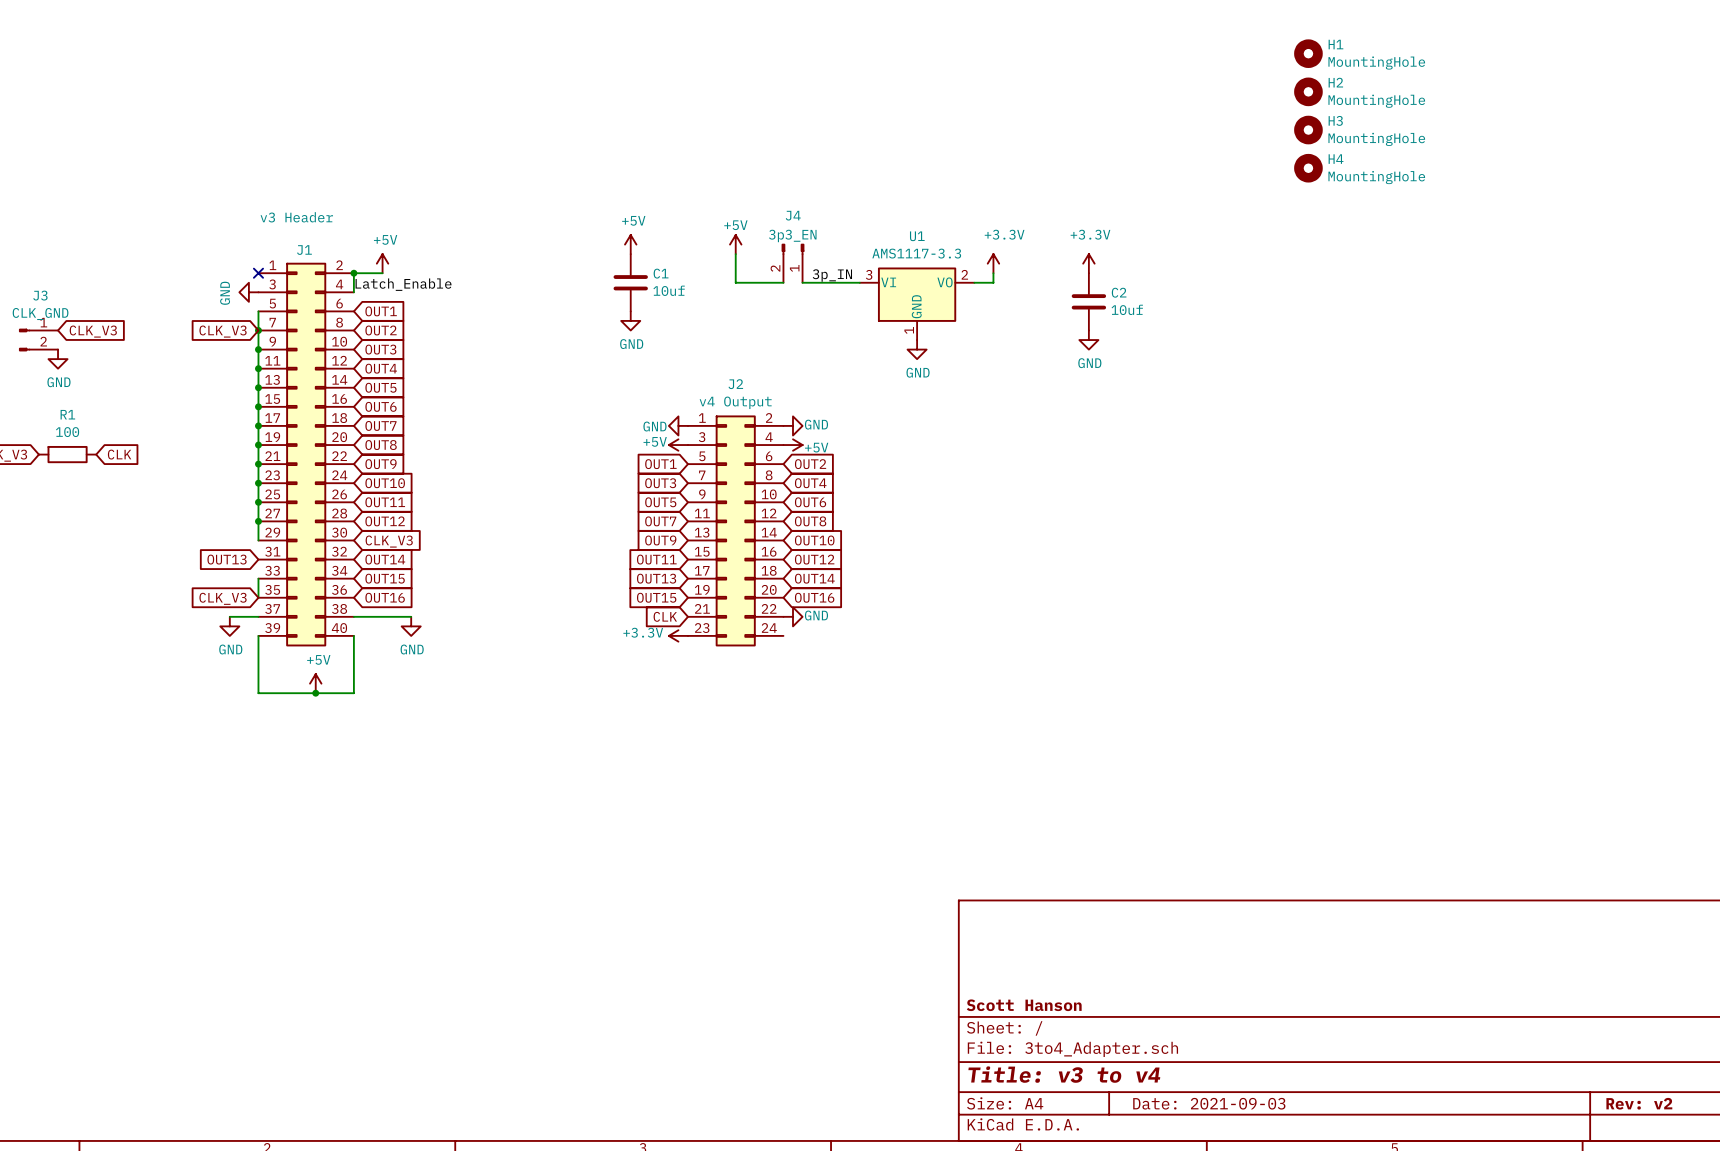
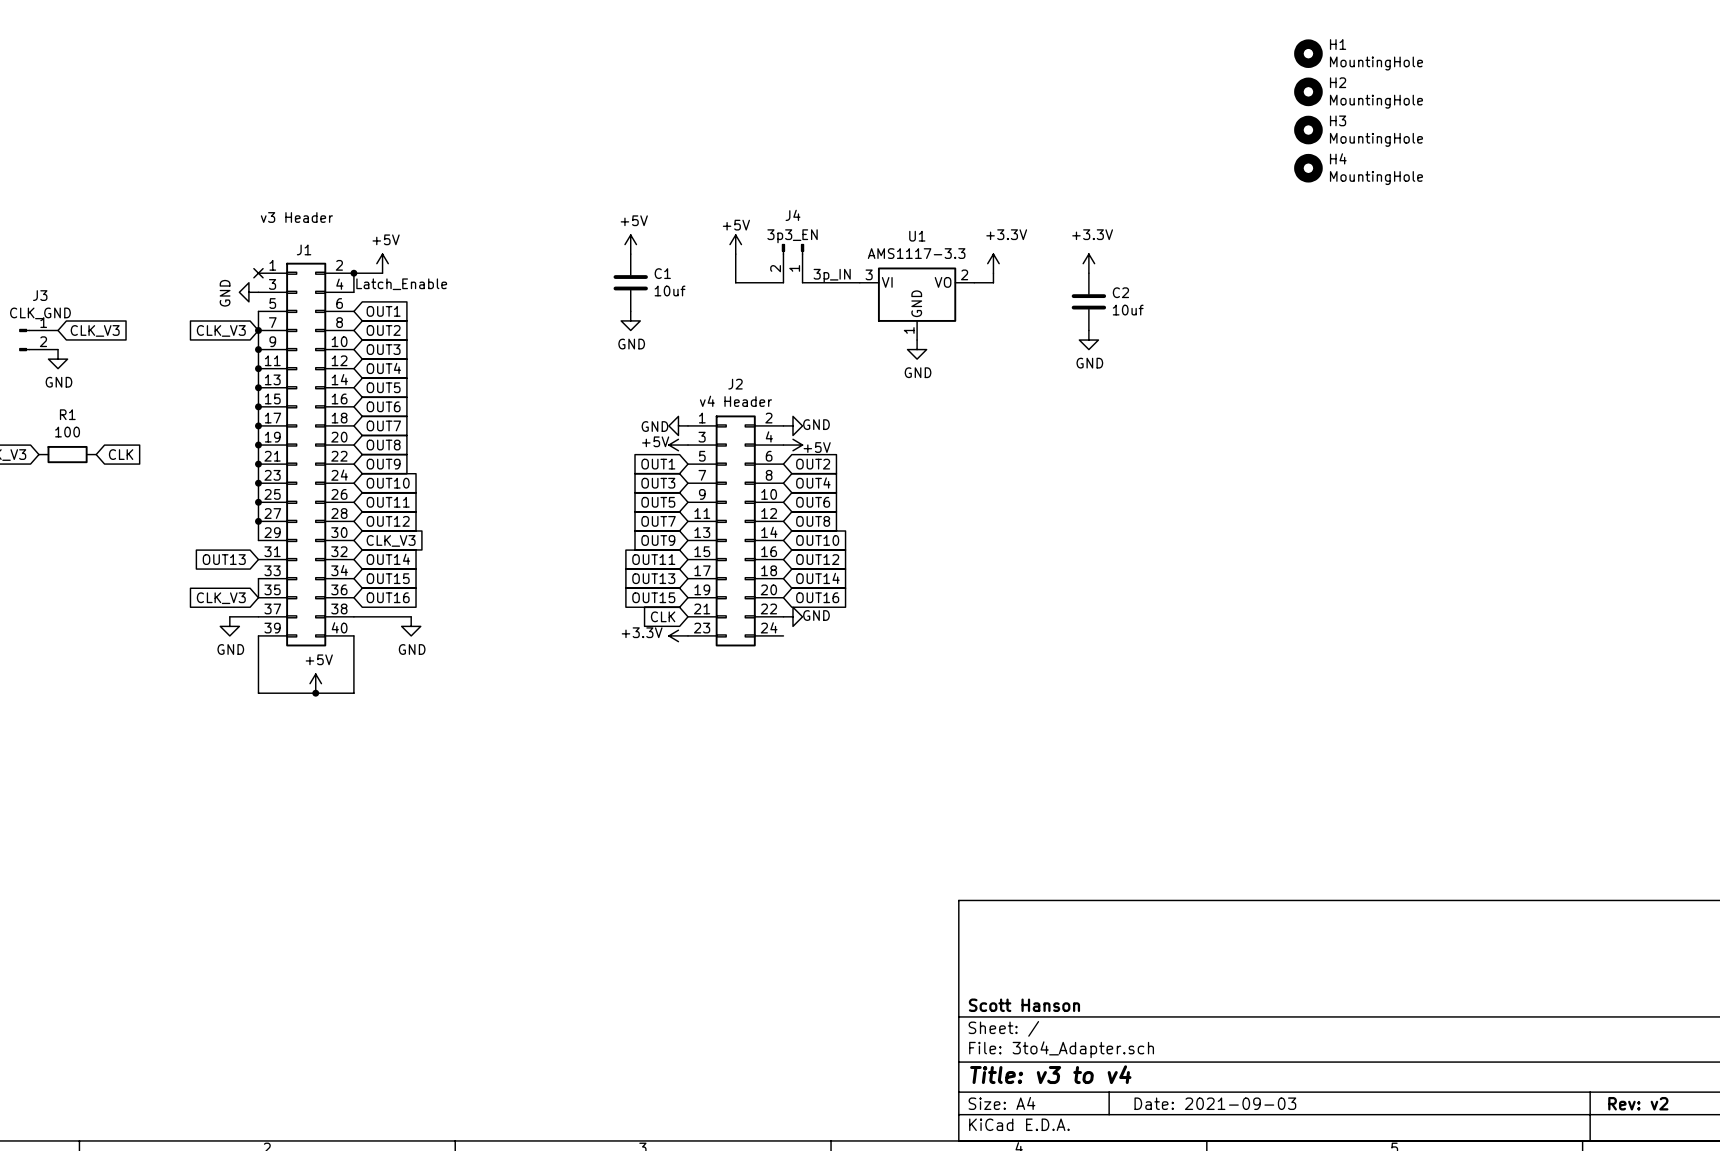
J2 value: v4 Output (735, 402) -> v4 Header (735, 401)

